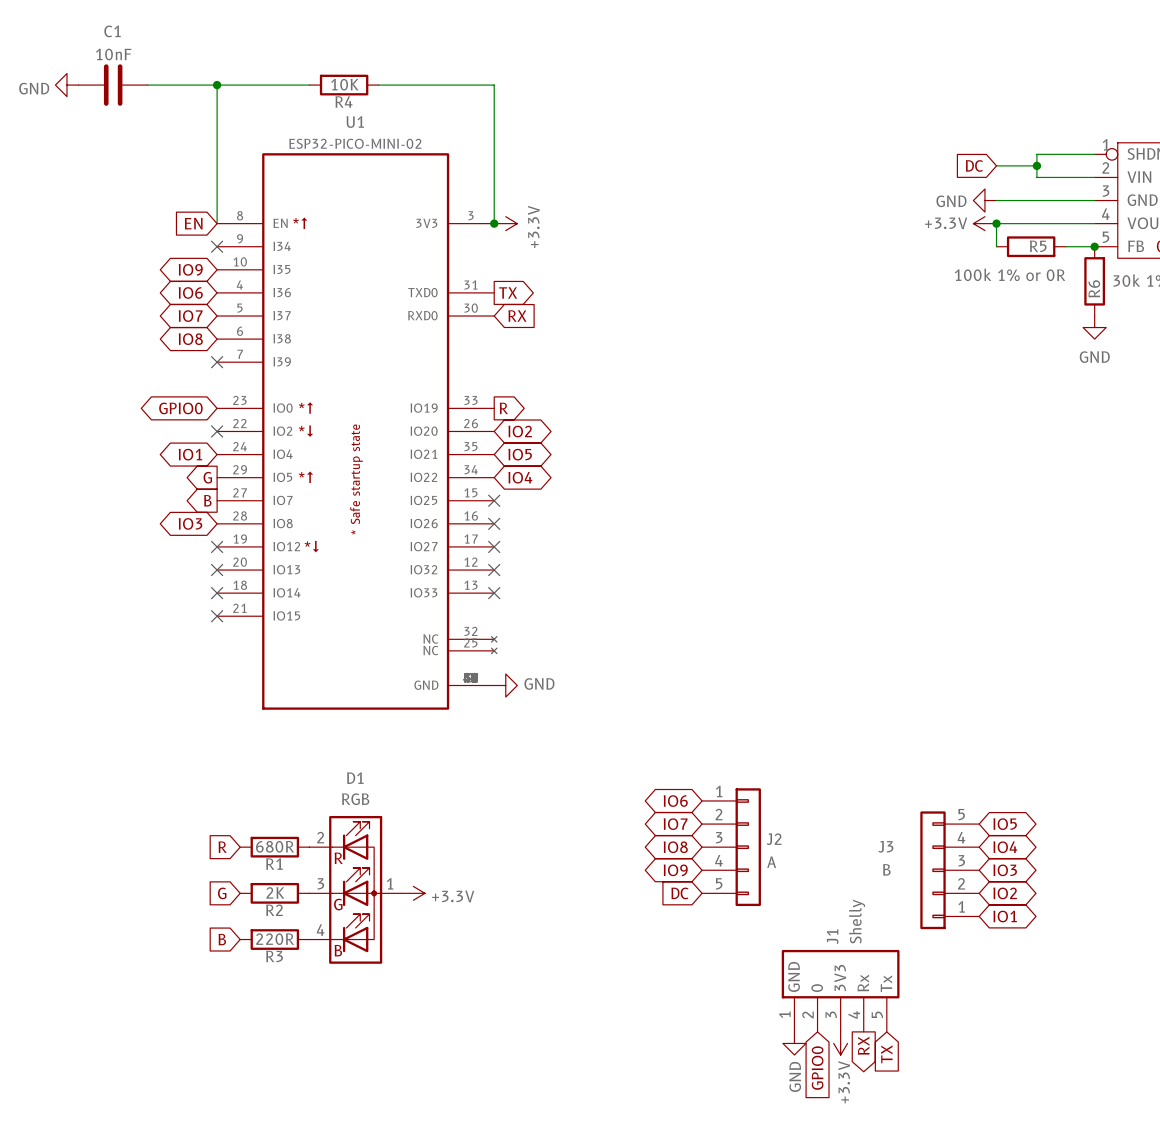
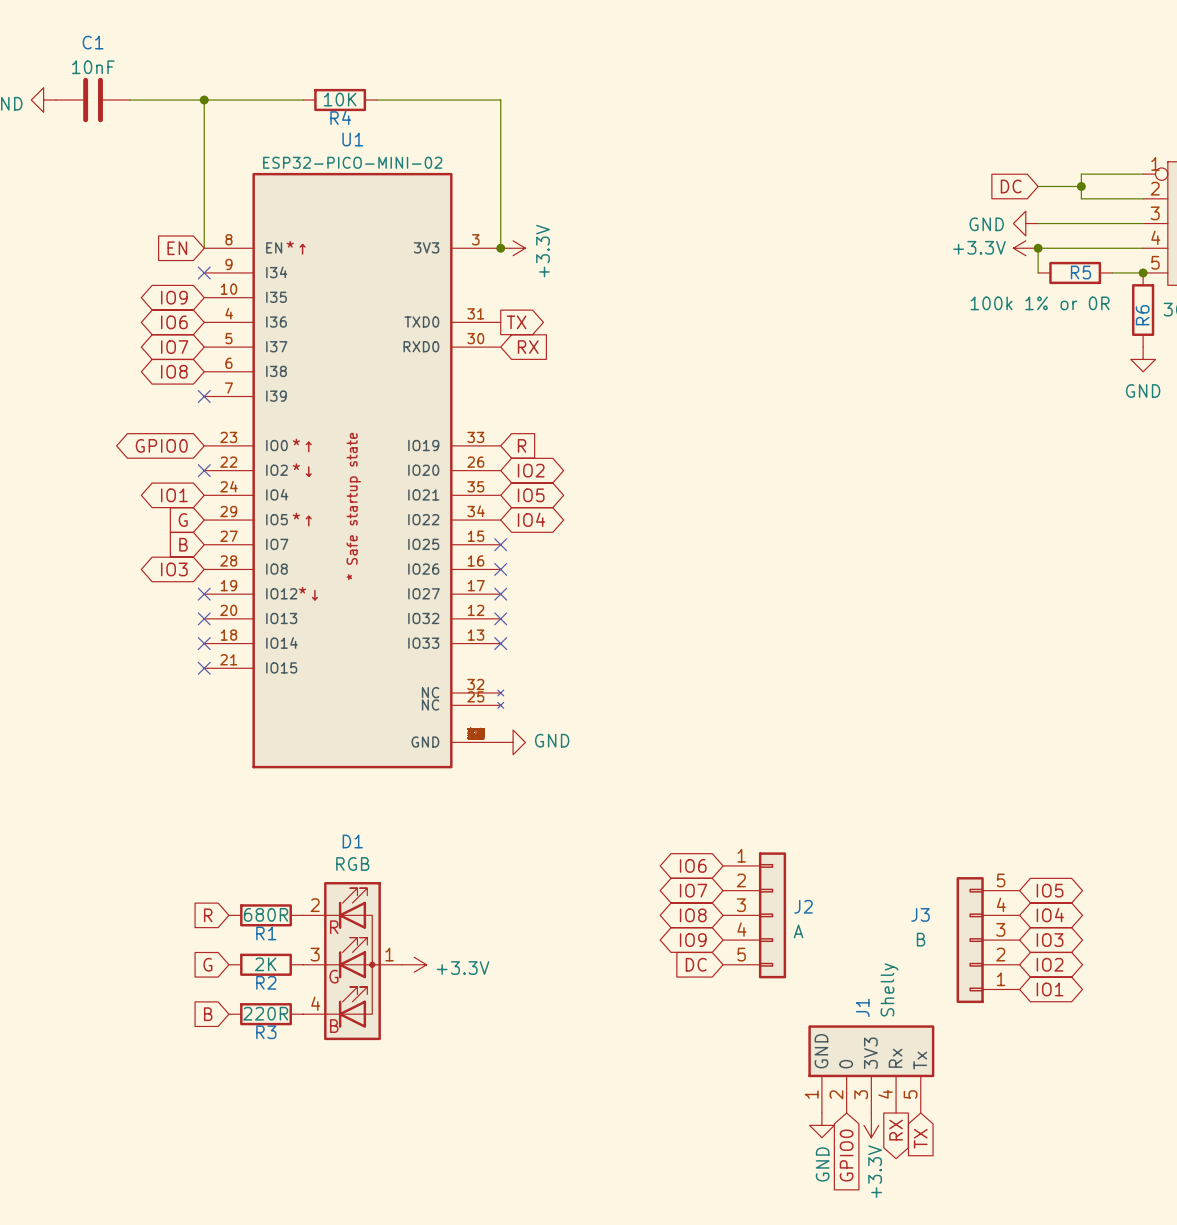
global label shape: output (503, 408) -> input (522, 445)
global label shape: output (207, 477) -> input (183, 520)
global label shape: output (207, 500) -> input (183, 544)

